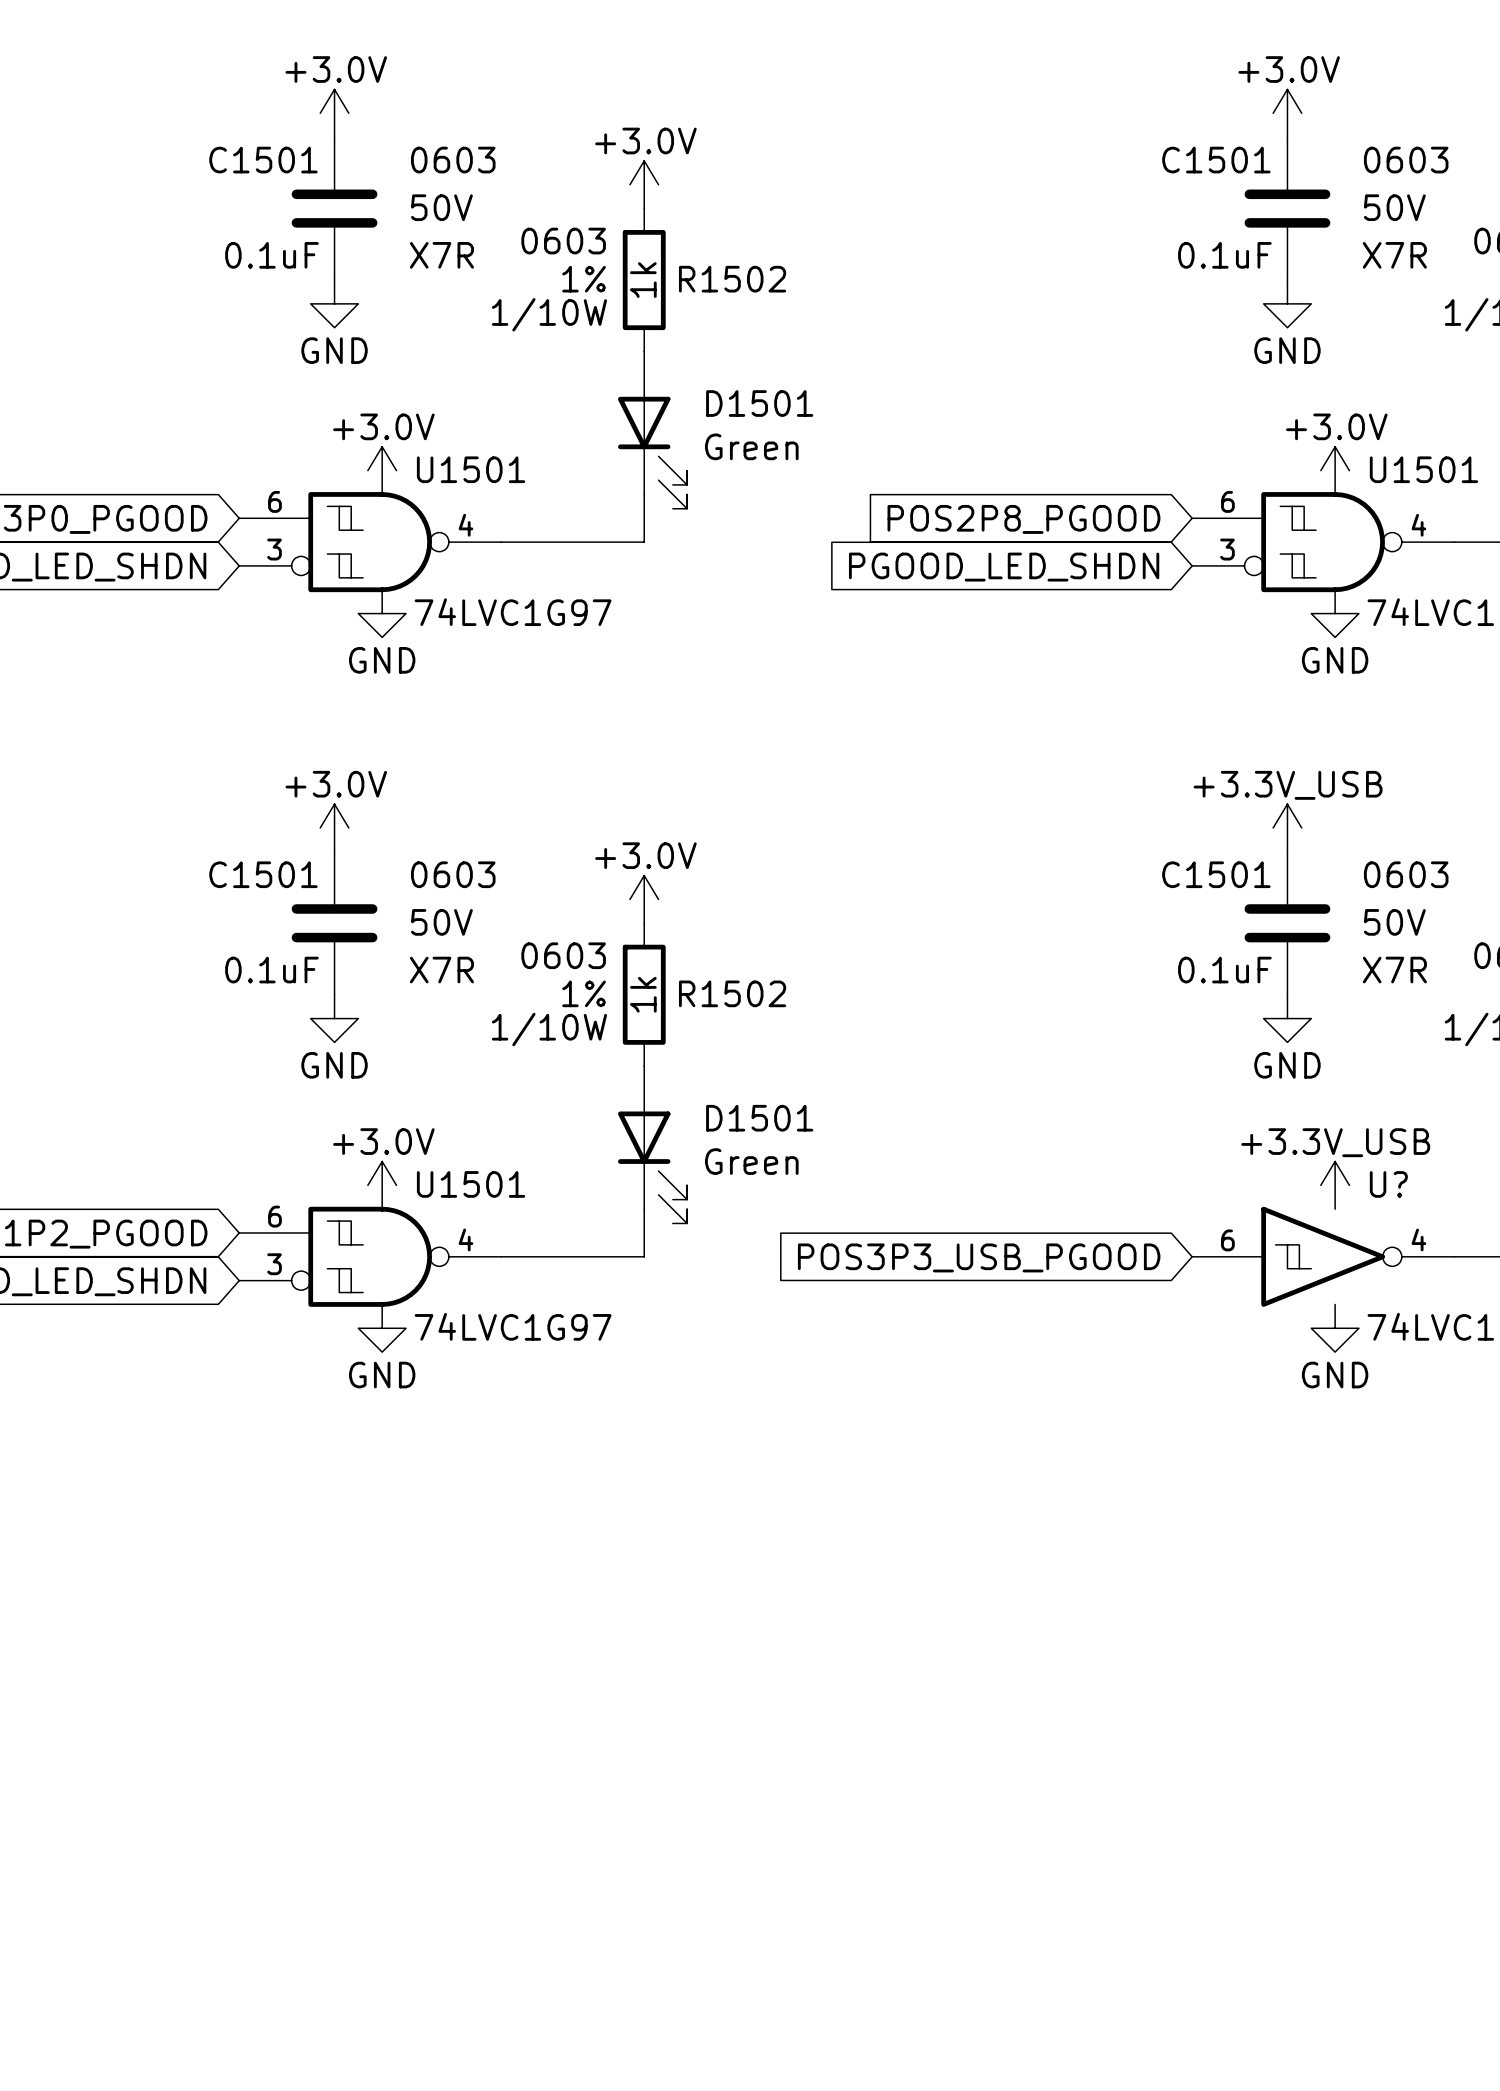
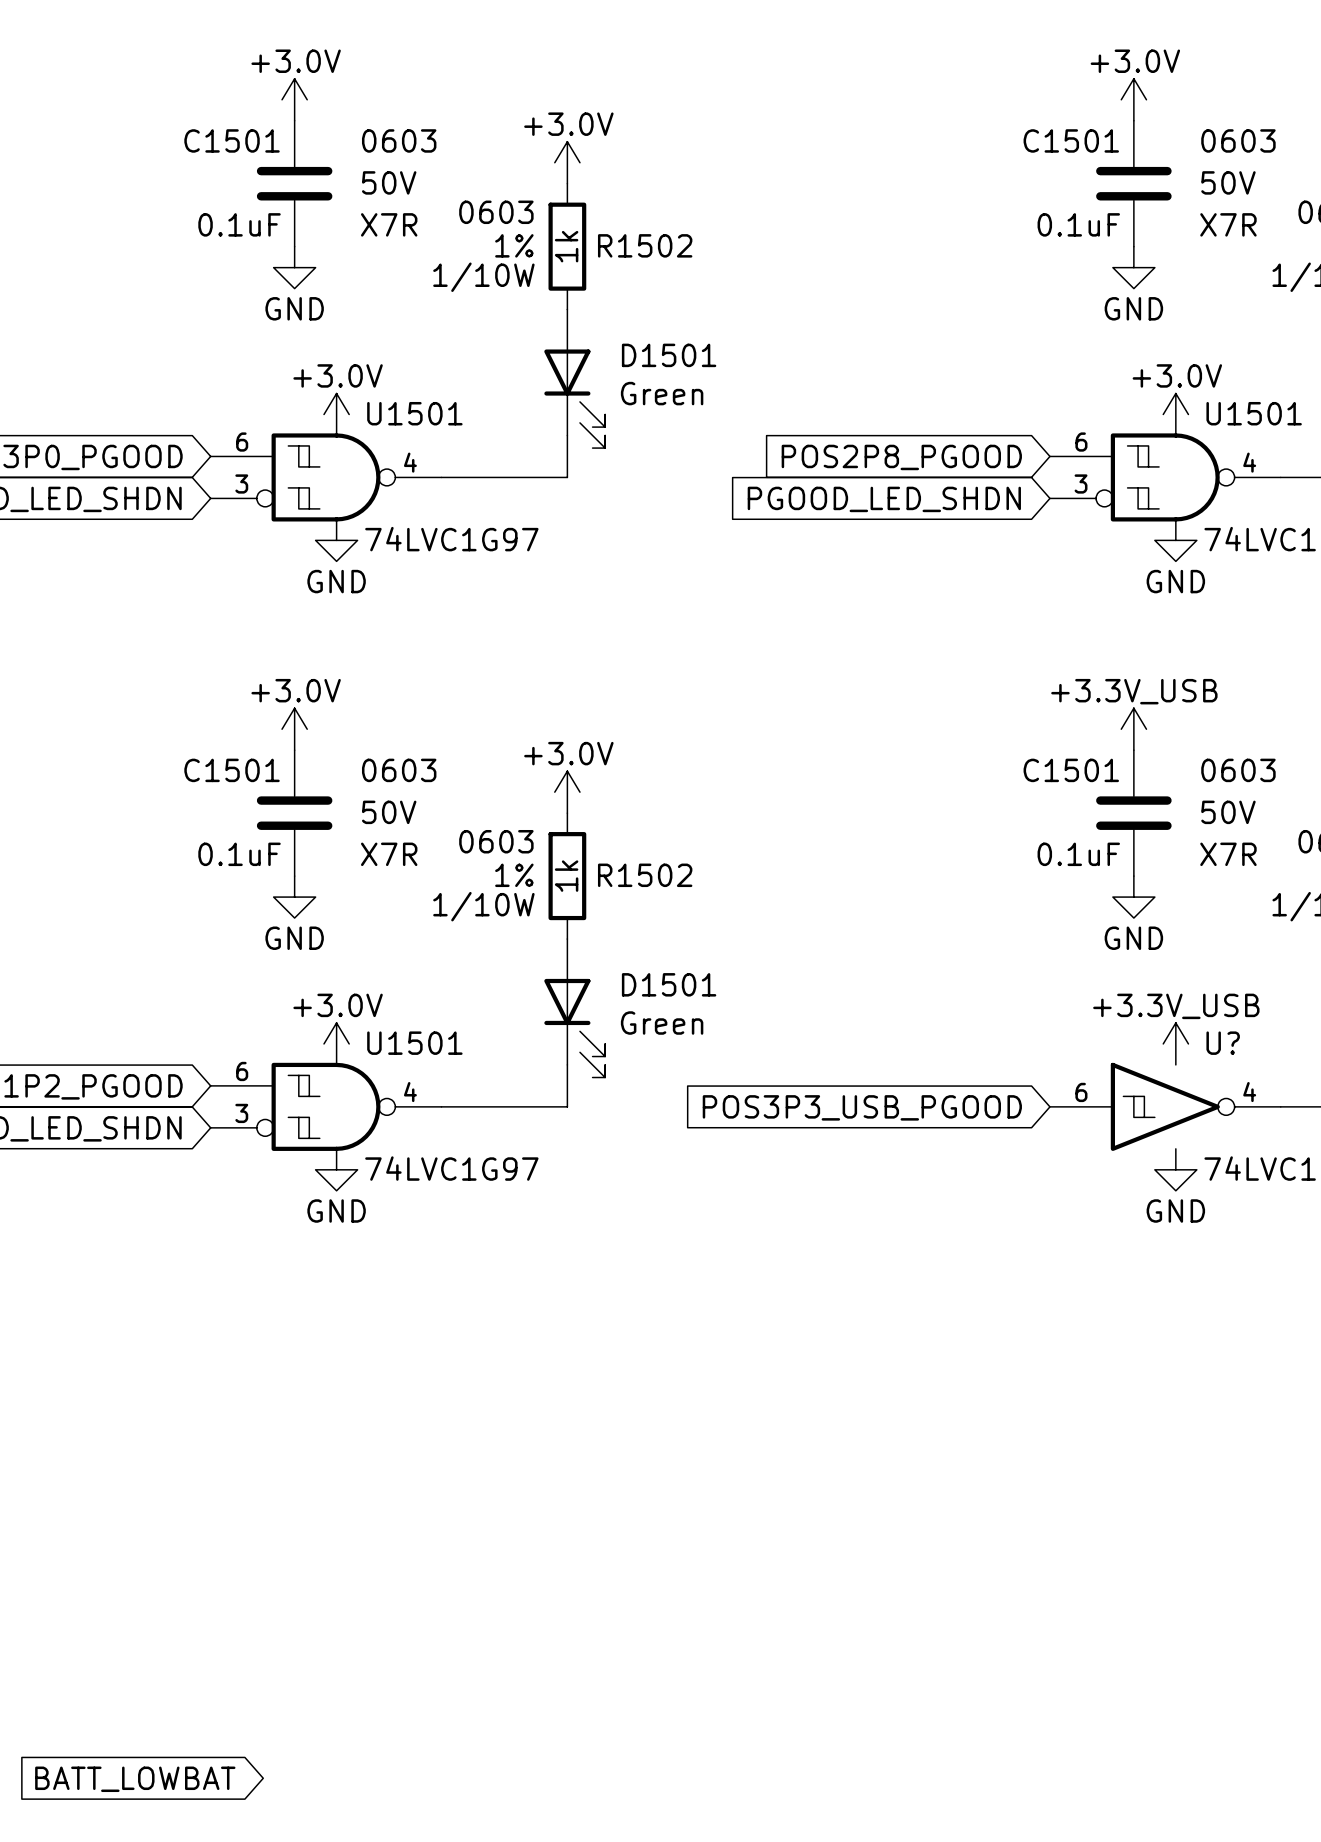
global label: none -> BATT_LOWBAT (135, 1779)

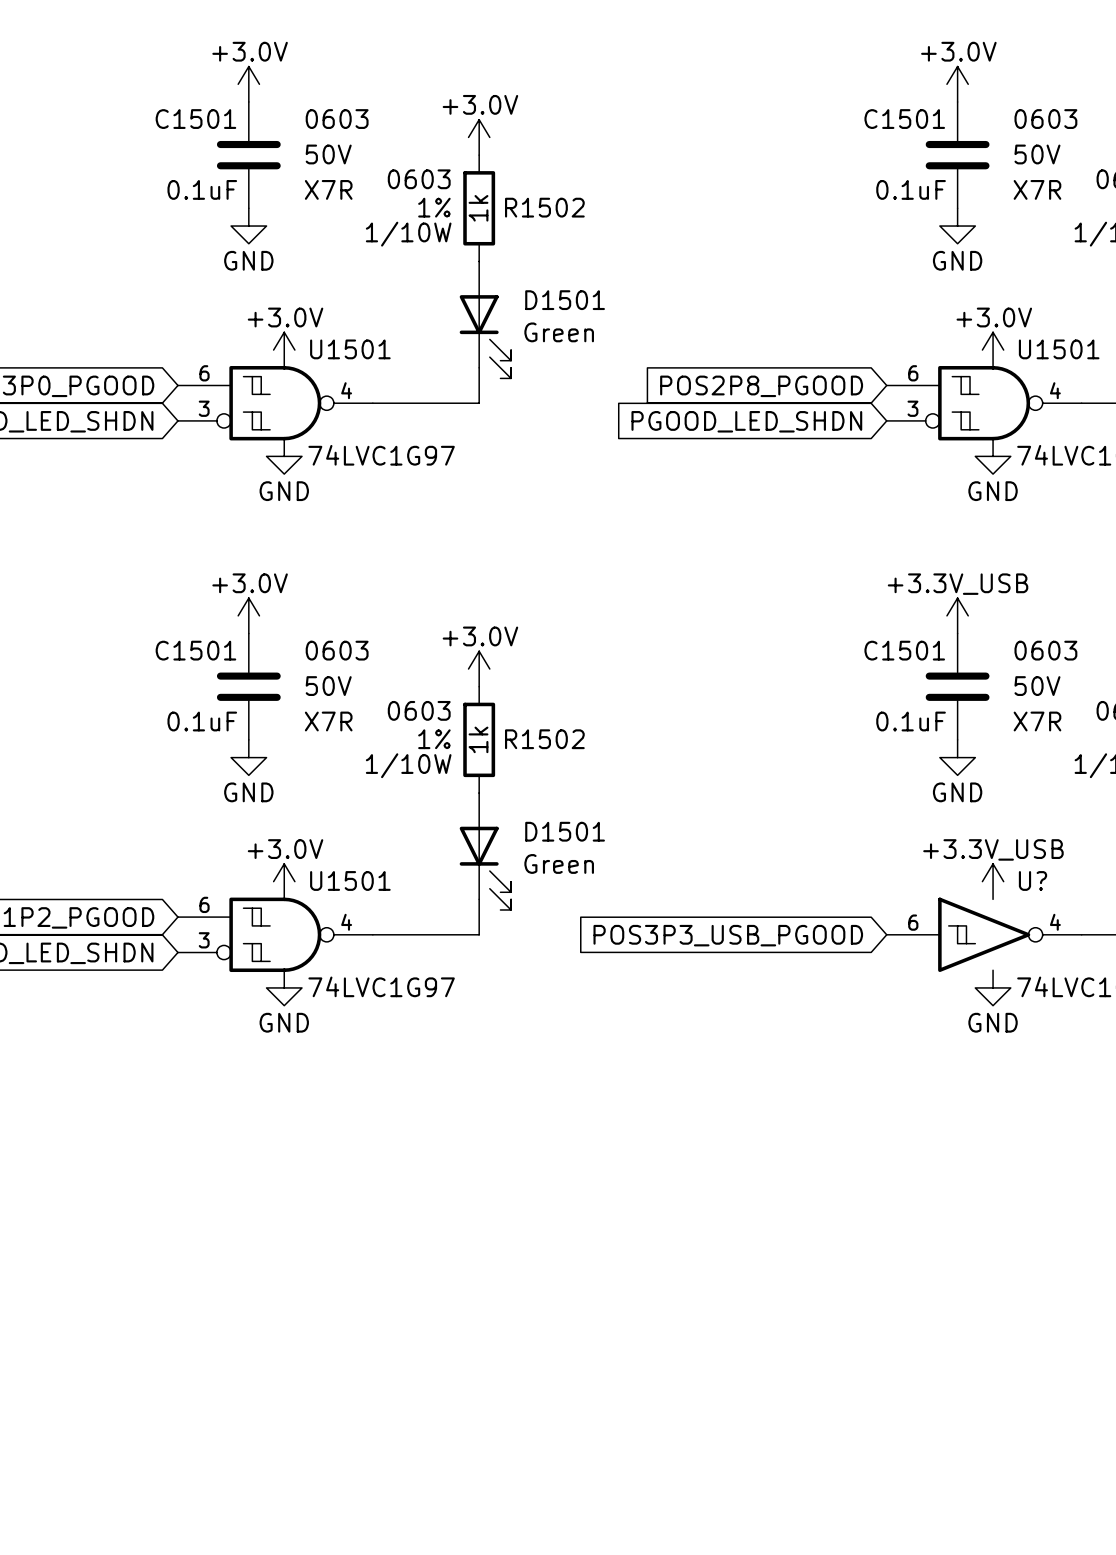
global label: BATT_LOWBAT (135, 1779) -> none

